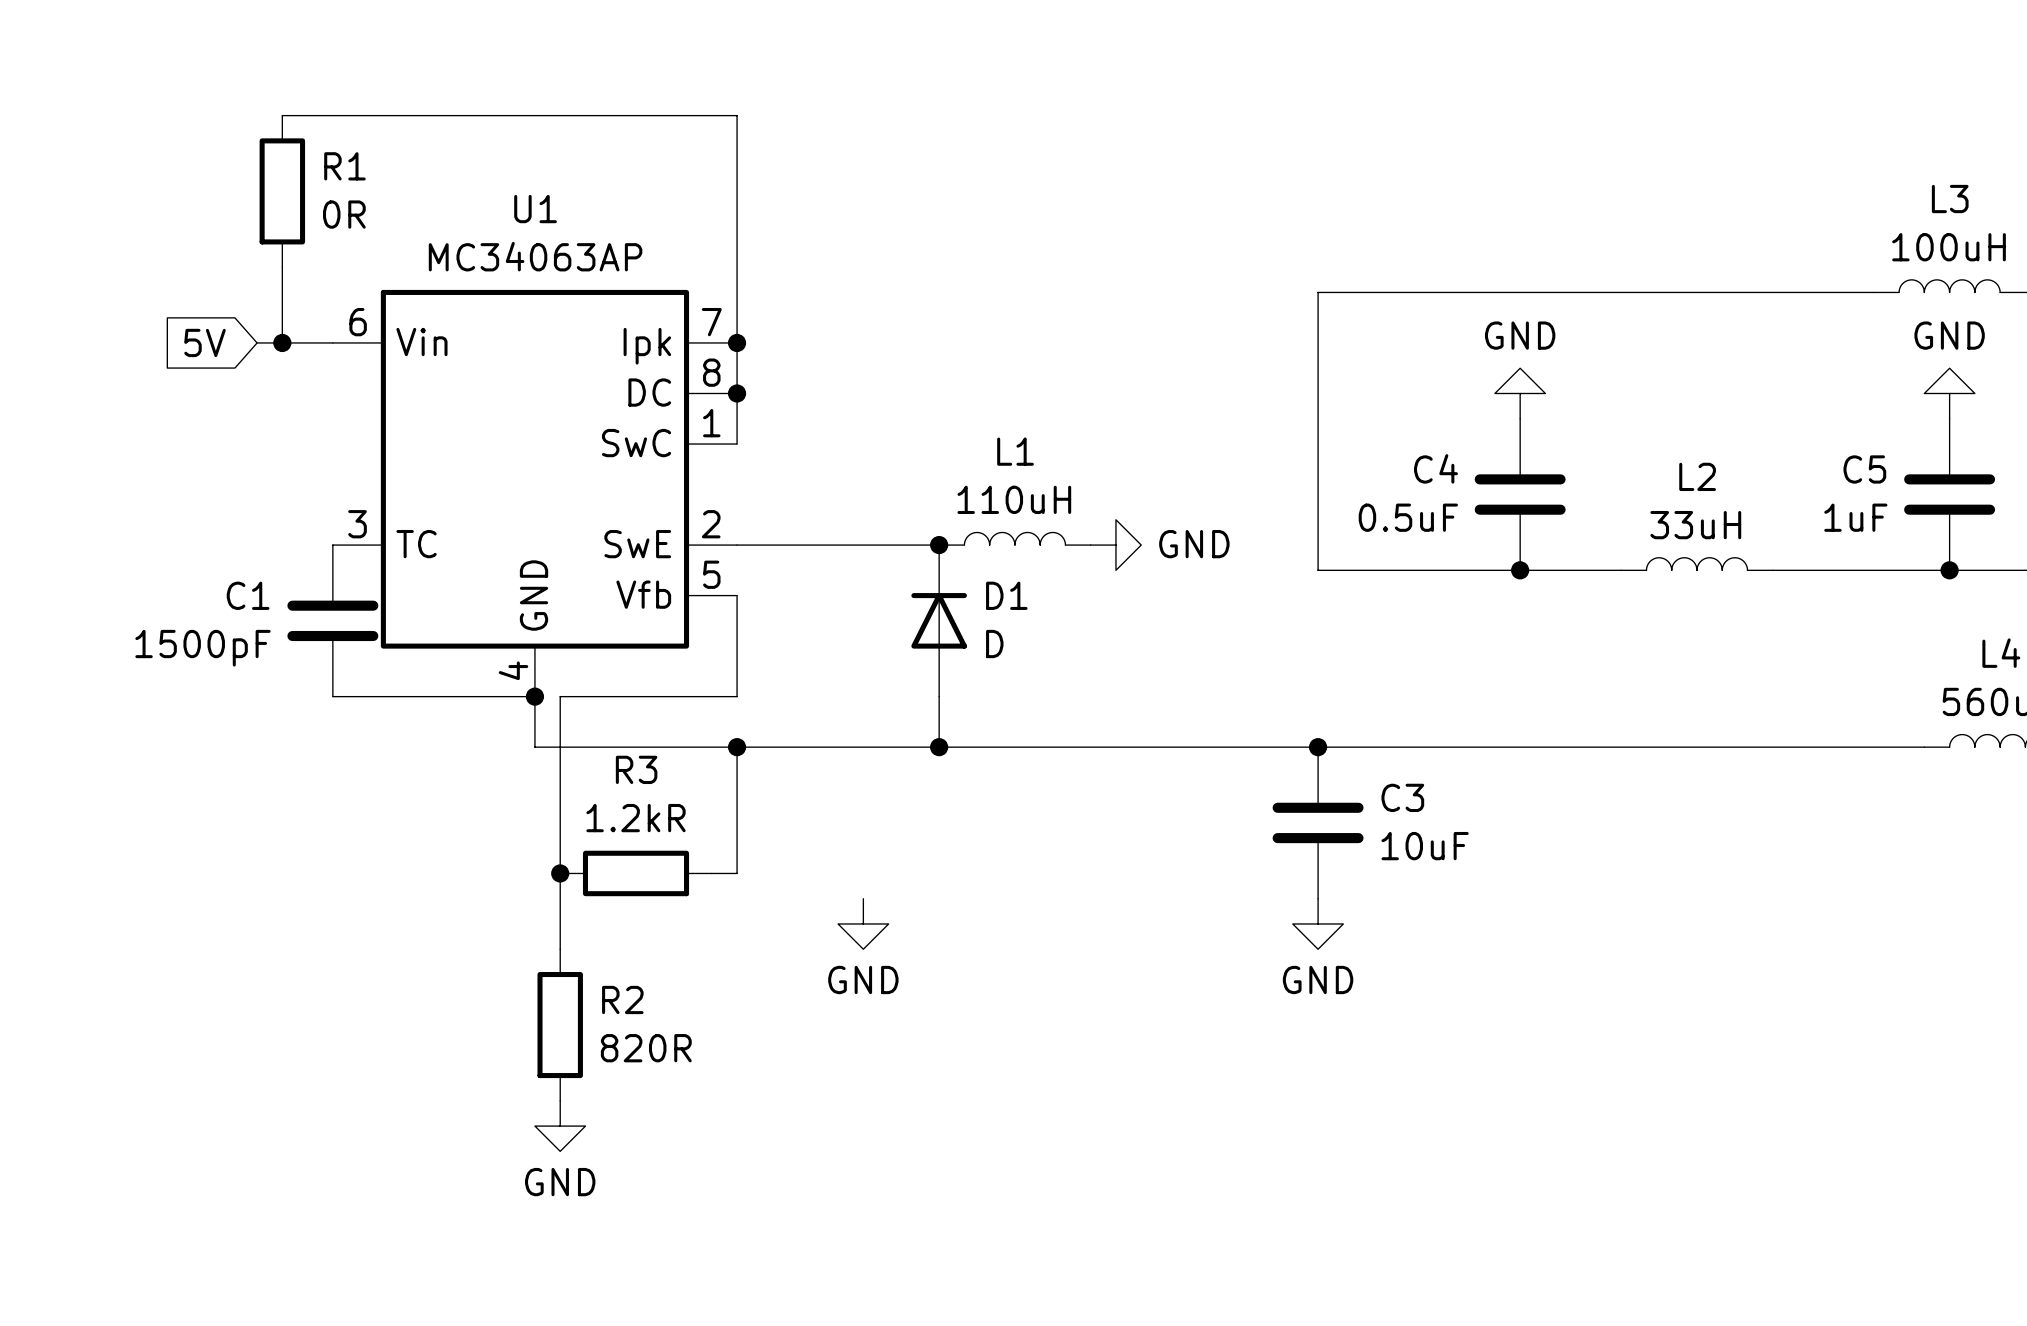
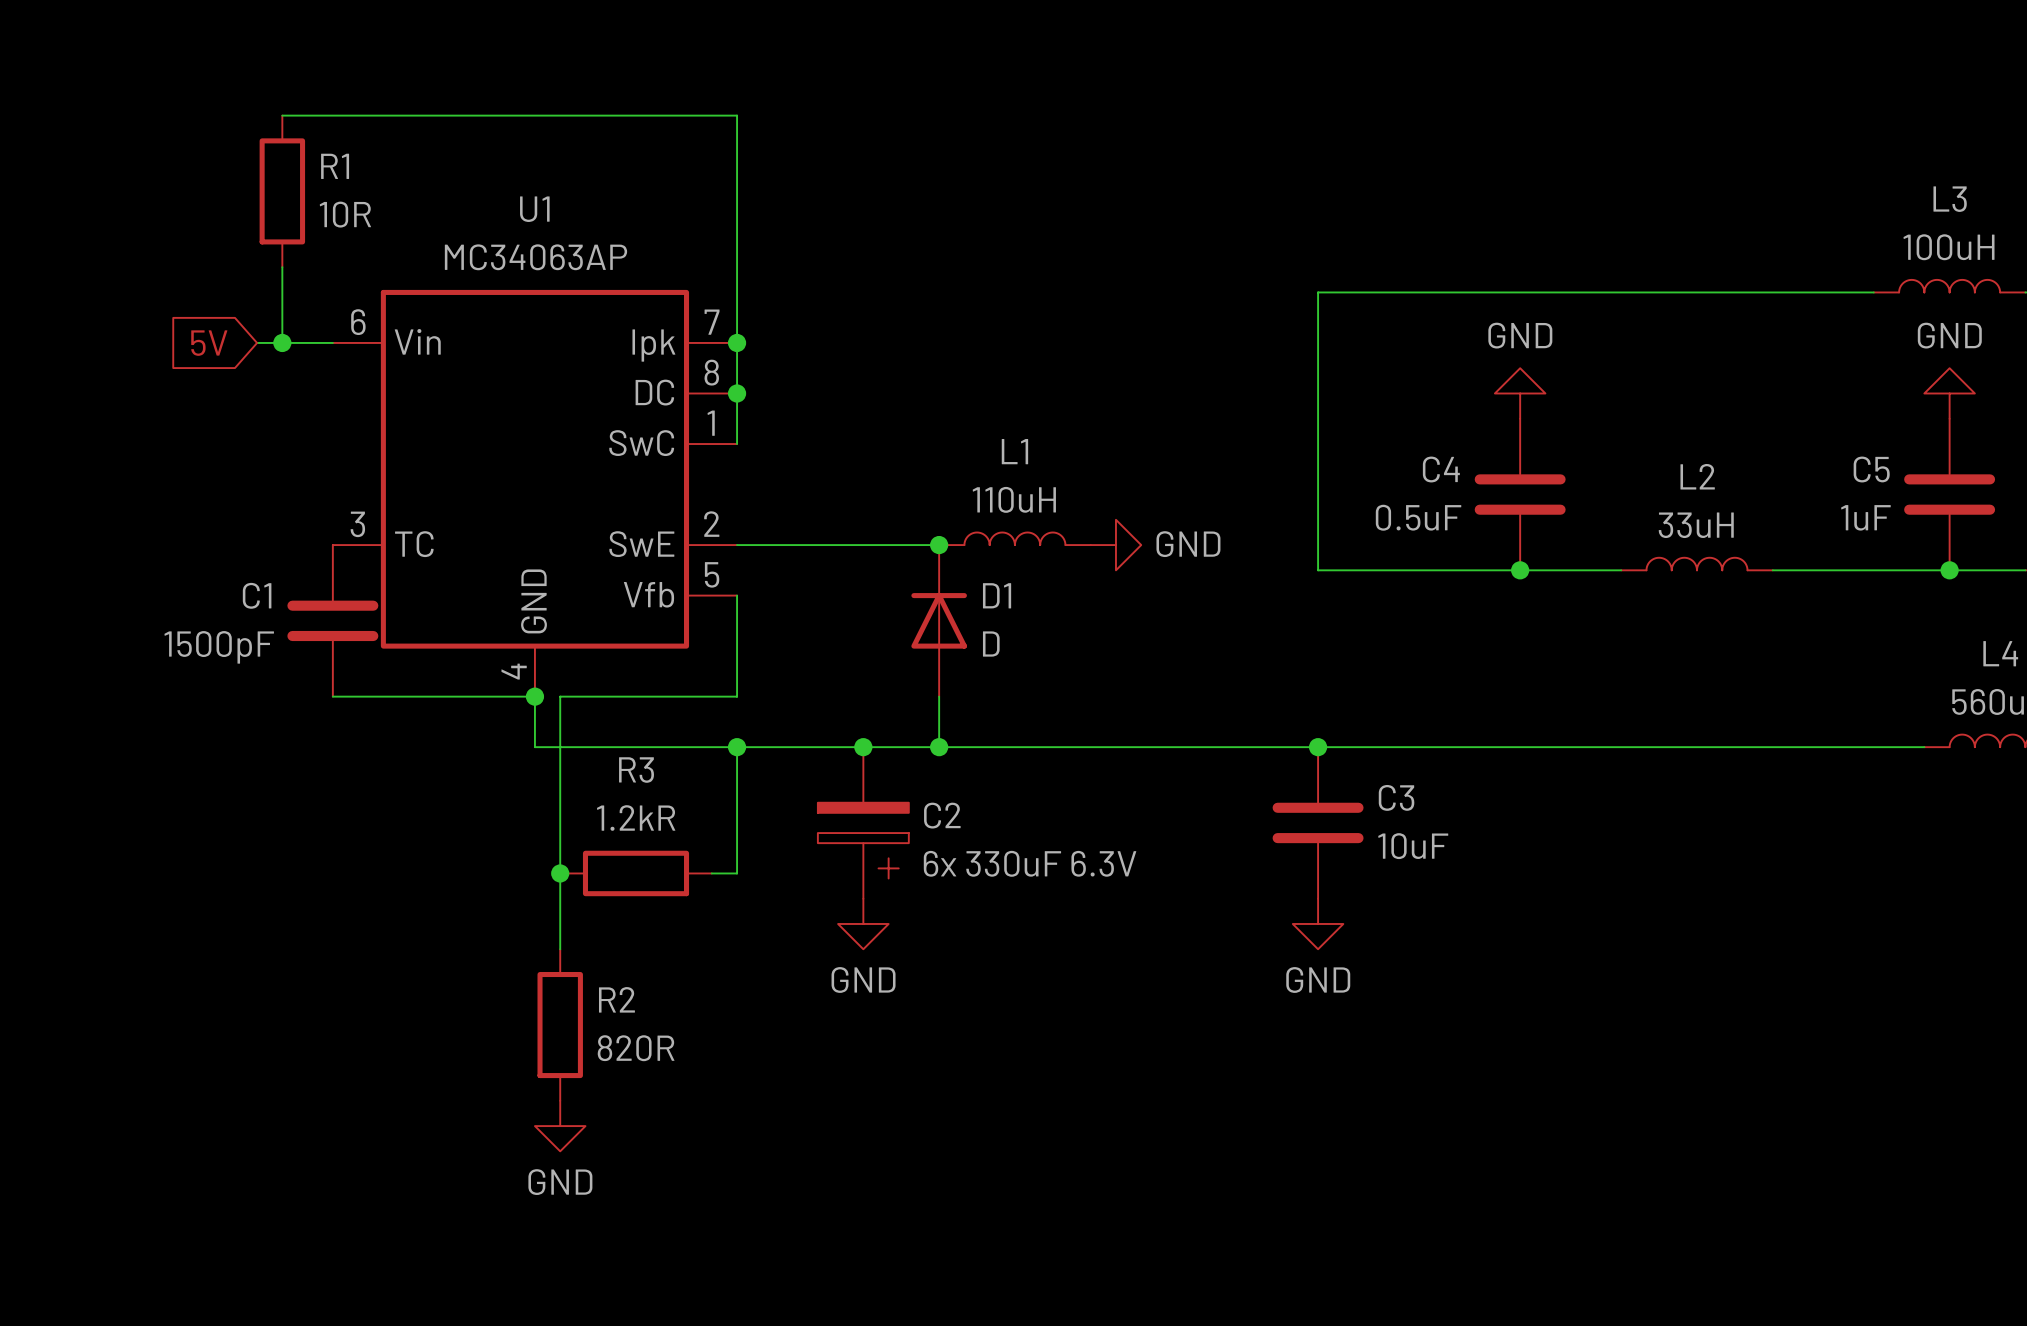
R1 value: 0R (344, 214) -> 10R (345, 214)
junction: none -> (863, 747)
C2: none -> 6x 330uF 6.3V (863, 822)

